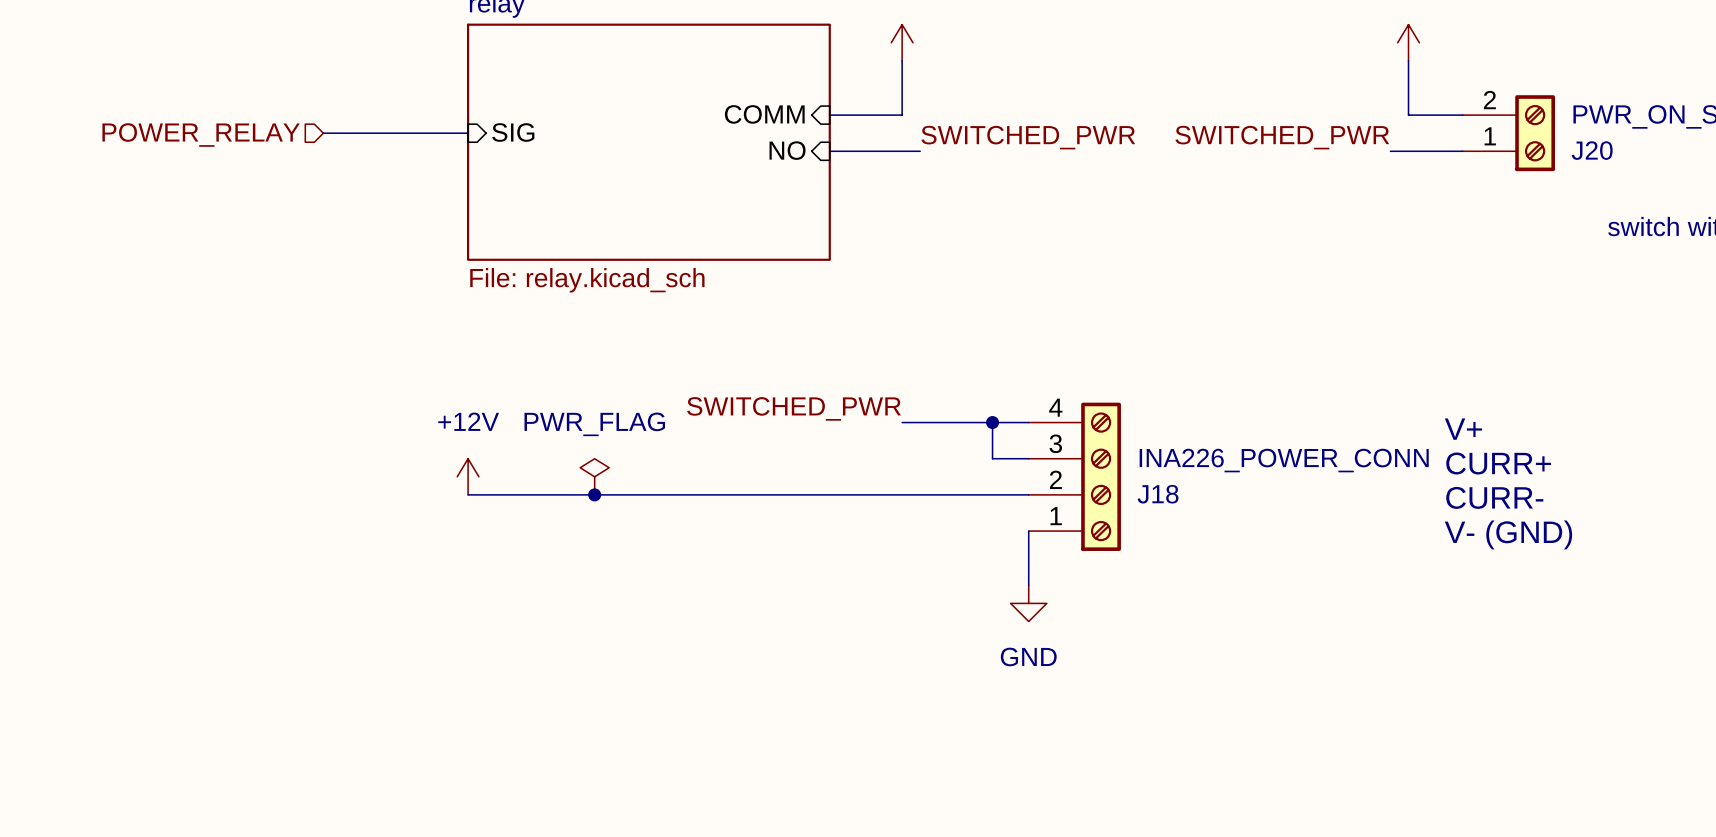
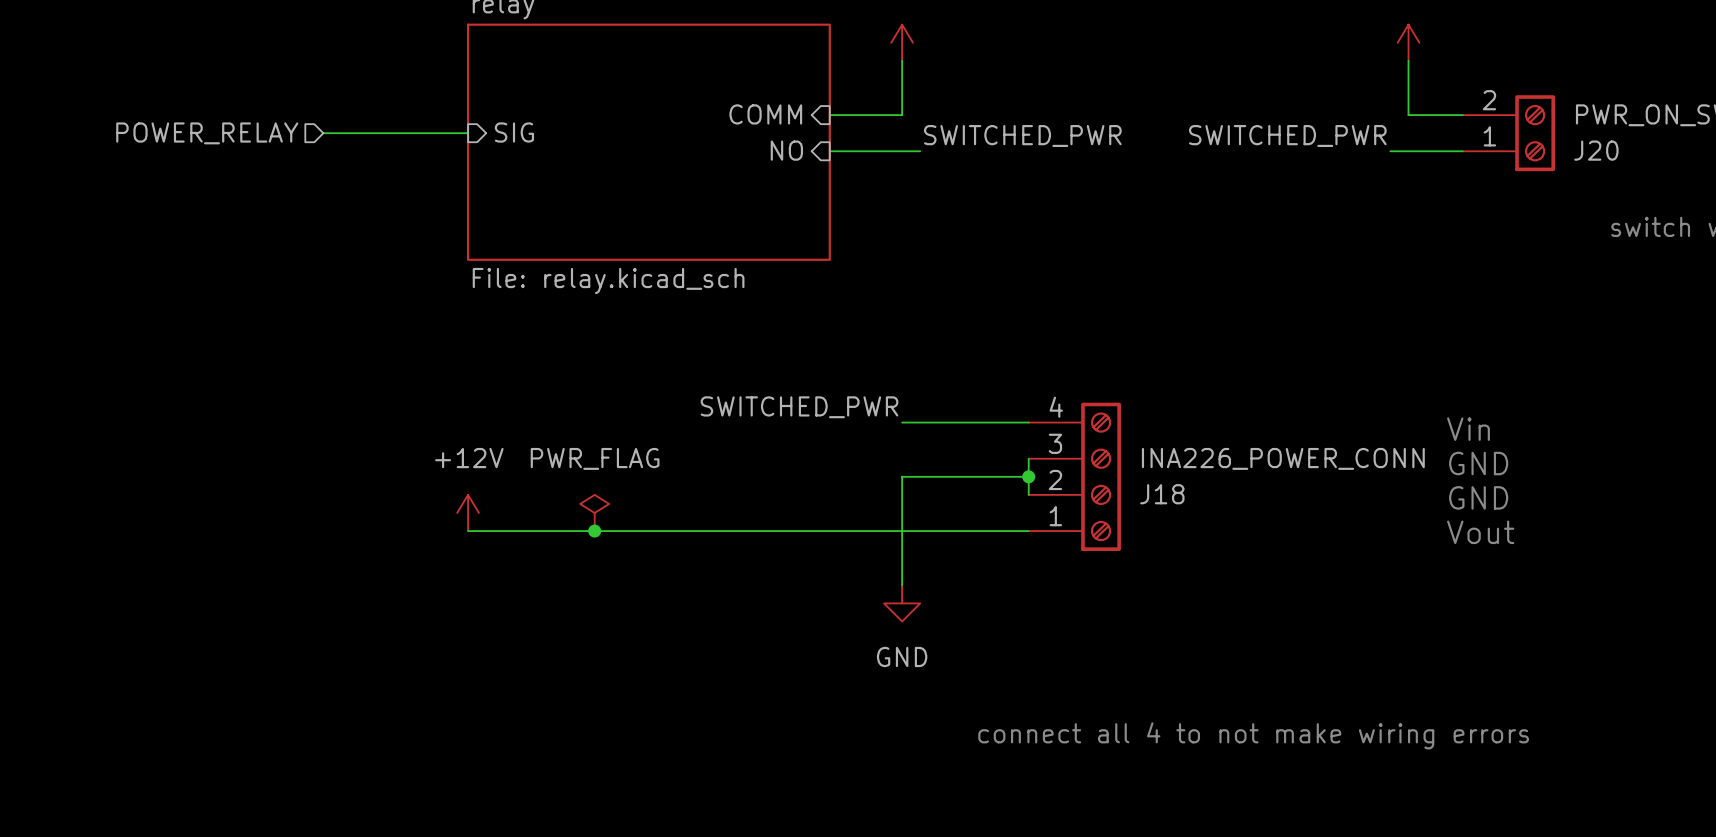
wire: (992, 422) (992, 458) (1028, 458) -> (1028, 494) (1028, 458)
junction position: (992, 422) -> (1028, 476)
text: V+ (1463, 429) -> Vin (1468, 429)
text: CURR+ (1498, 463) -> GND (1478, 463)
power symbol position: +12V (468, 476) -> +12V (468, 512)
power symbol position: PWR_FLAG (594, 476) -> PWR_FLAG (594, 512)
wire: none -> (1028, 476) (902, 476) (902, 585)
wire: (468, 494) (1028, 494) -> none
junction position: (594, 494) -> (594, 531)
text: CURR- (1494, 497) -> GND (1478, 497)
wire: (1028, 531) (1028, 585) -> (1028, 531) (468, 531)
text: V- (GND) (1508, 534) -> Vout (1480, 532)
power symbol position: GND (1028, 603) -> GND (902, 603)
text: none -> connect all 4 to not make wiring errors (1253, 735)

